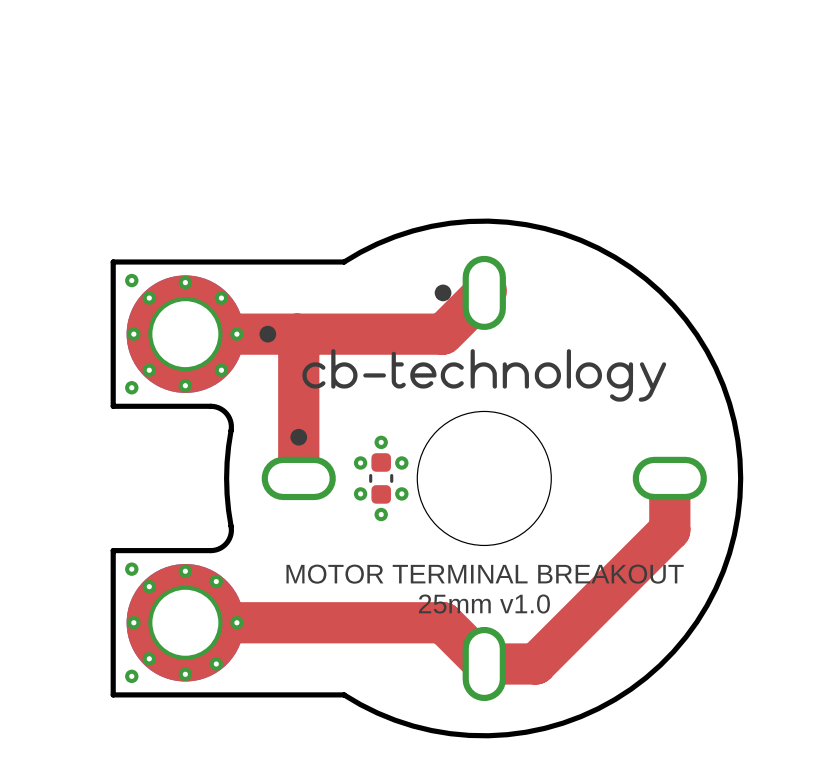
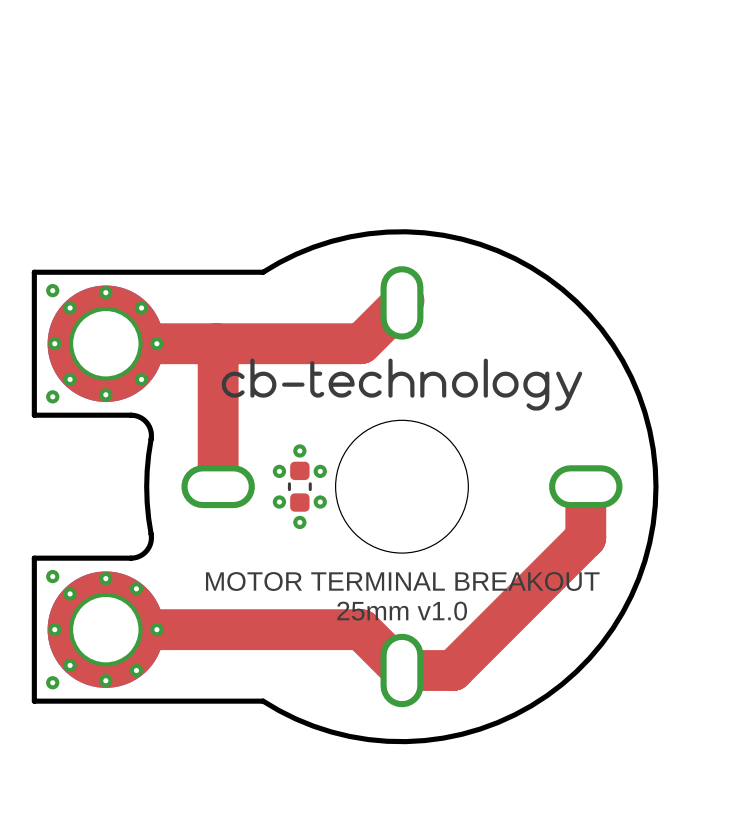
drawing: [434, 284, 452, 302] -> none
drawing: [259, 325, 277, 343] -> none
drawing: [290, 428, 308, 446] -> none

